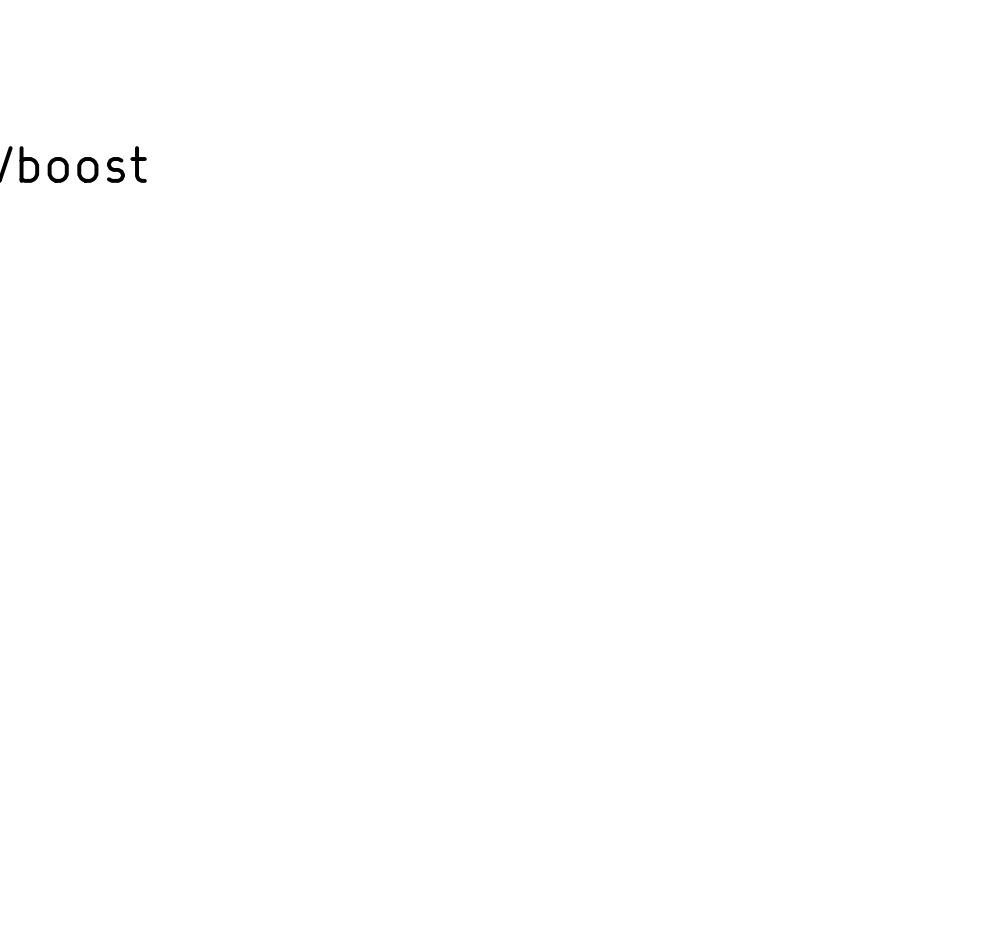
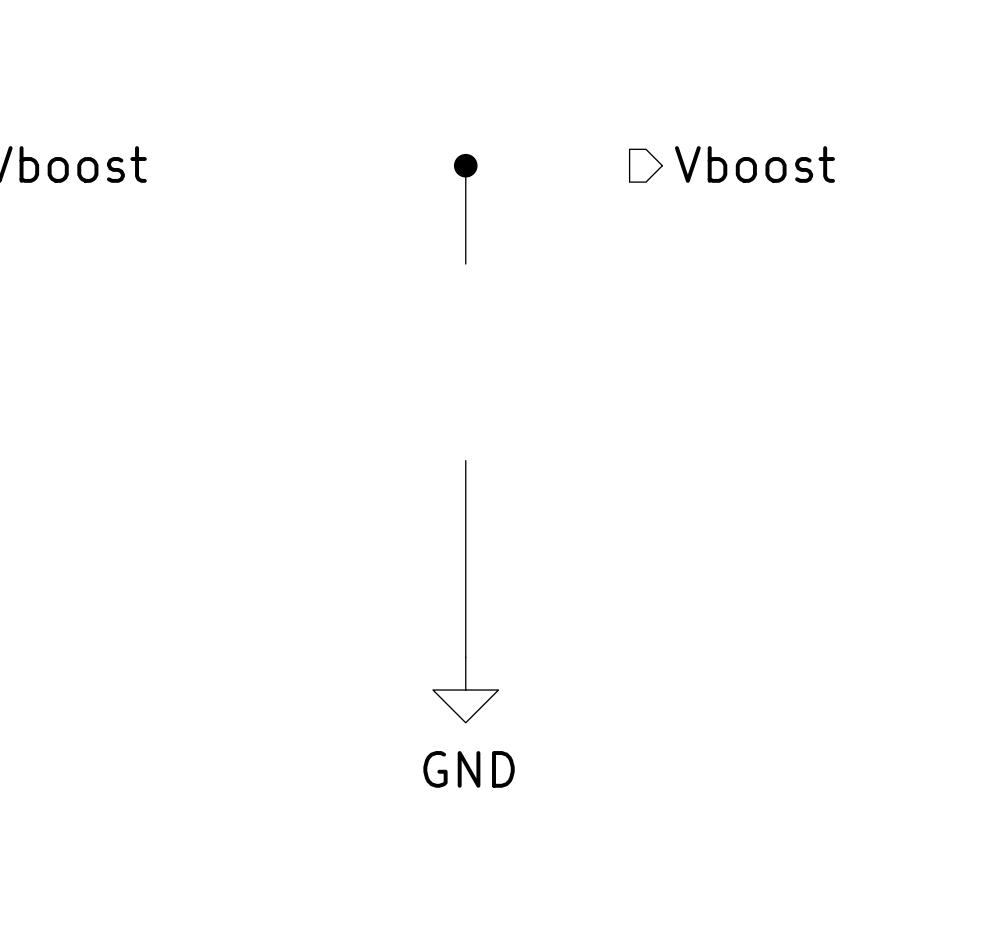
hierarchical label: none -> Vboost (754, 164)
wire: none -> (465, 165) (465, 264)
junction: none -> (465, 165)
wire: none -> (465, 460) (465, 657)
power symbol: none -> GND (465, 690)

